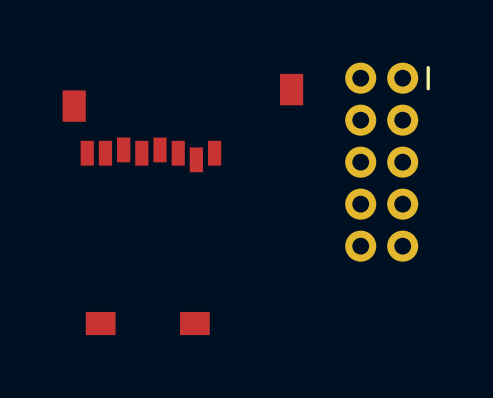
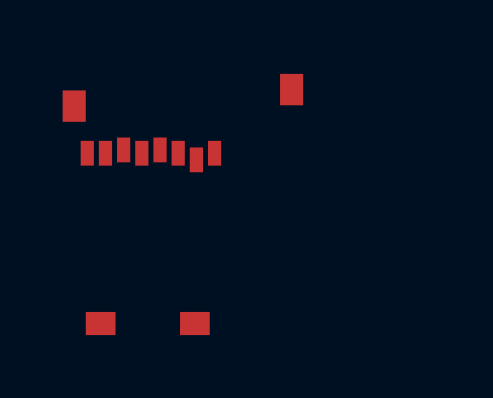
part: (387, 162) -> none

